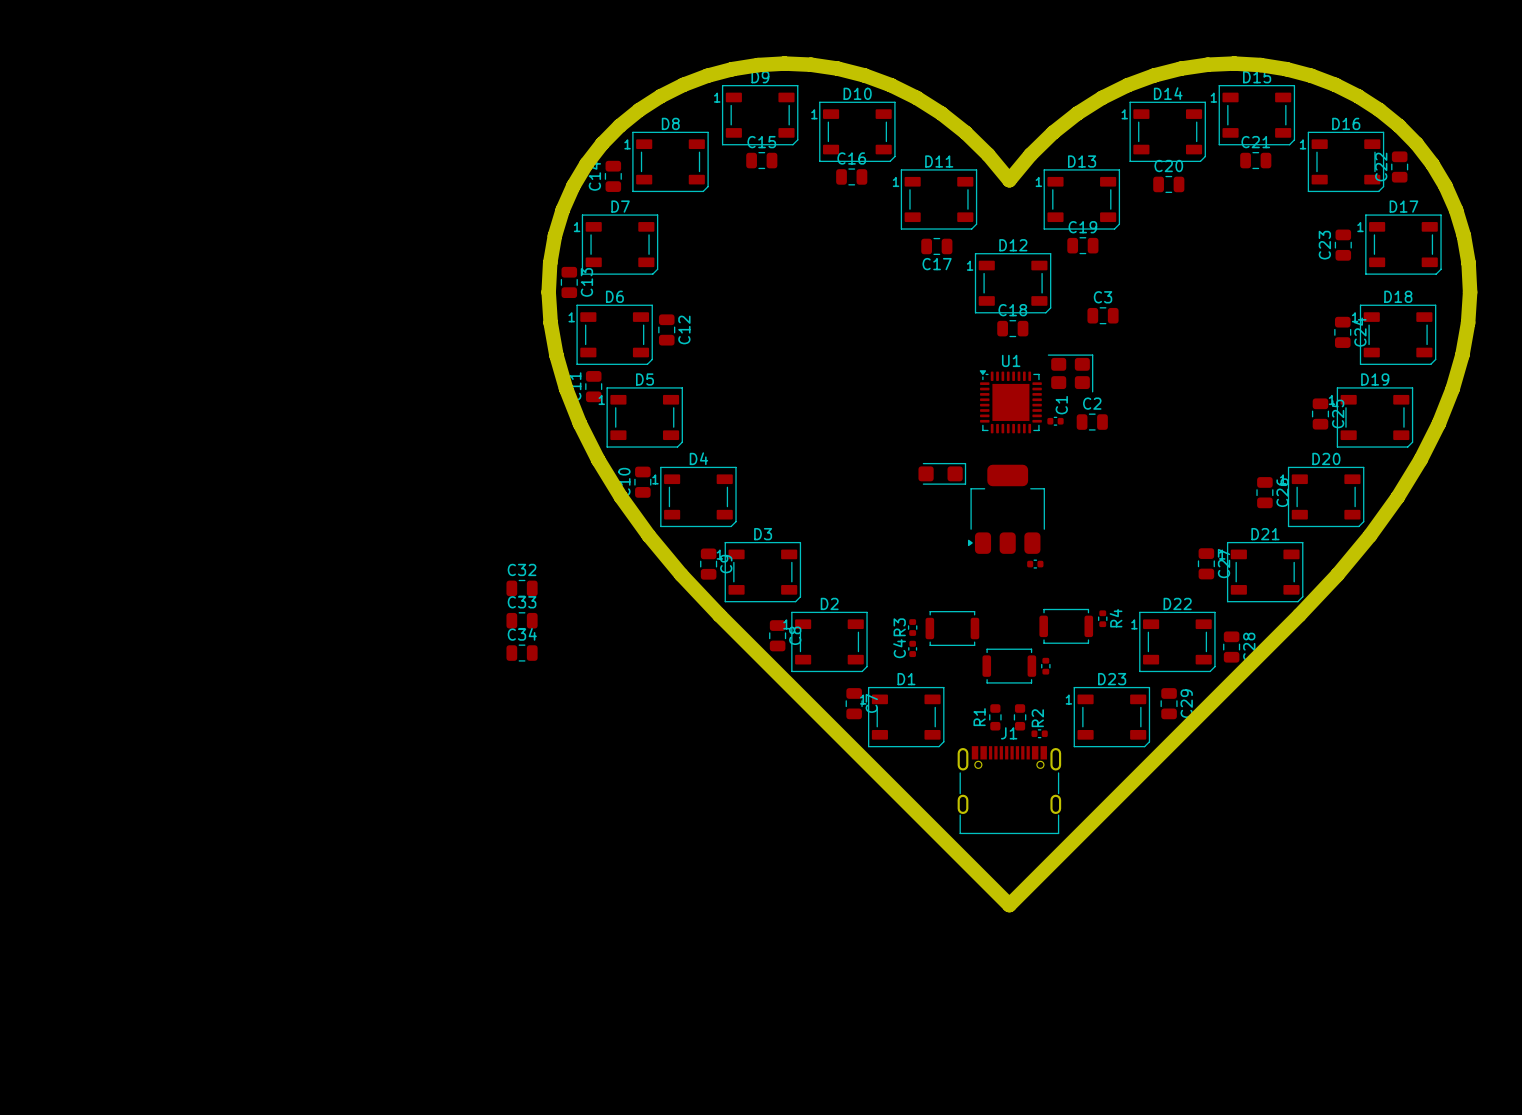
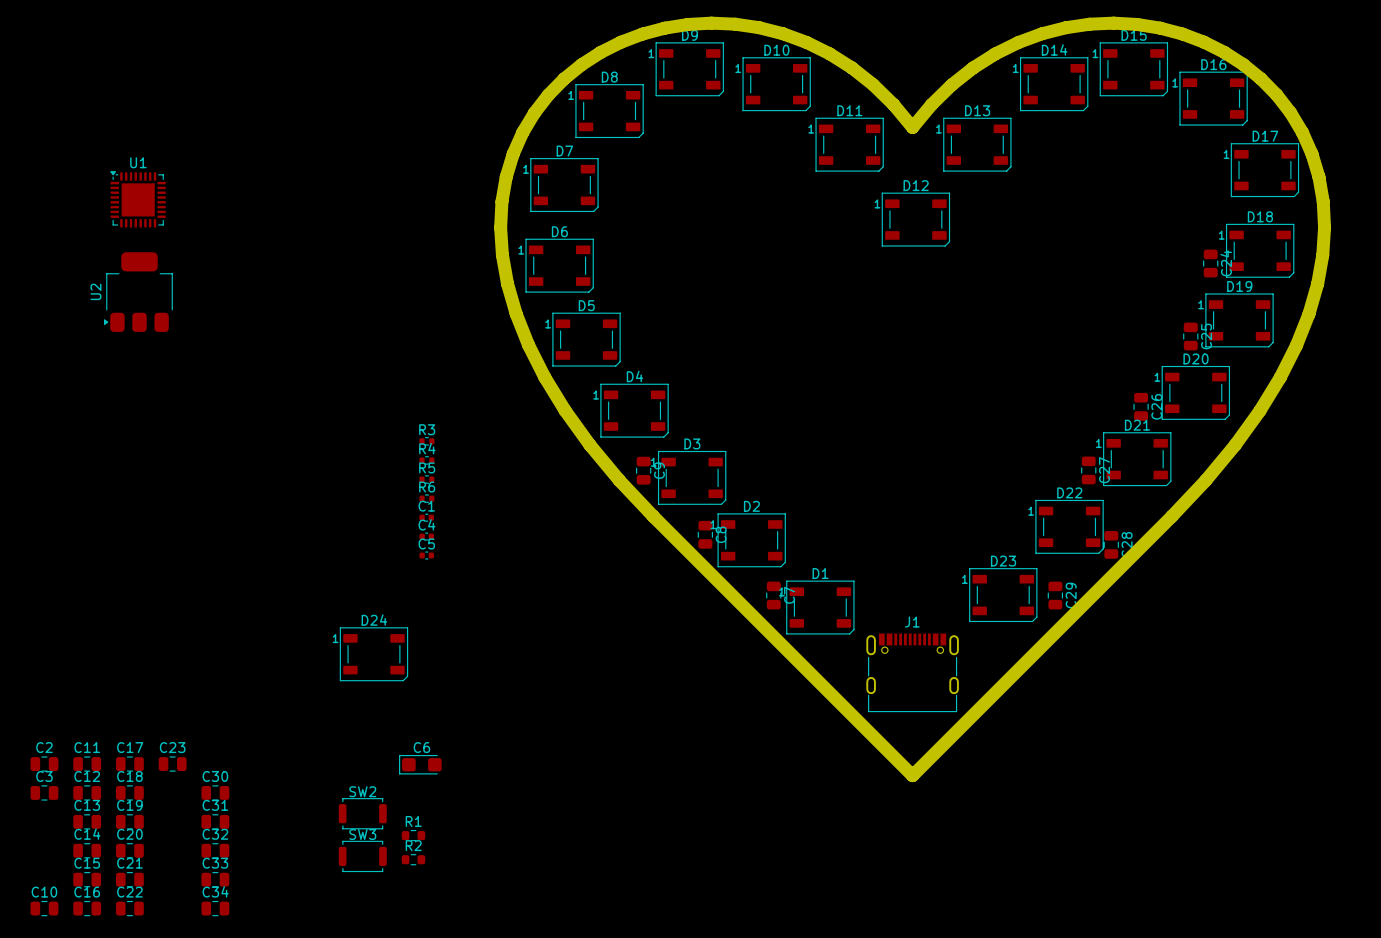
C15 position: (761, 160) -> (87, 879)
C21 position: (1255, 160) -> (129, 879)
D16 position: (1345, 161) -> (1213, 98)
C22 rotation: 0° (1399, 166) -> 90° clockwise (129, 908)
C22 position: (1399, 166) -> (129, 908)
C14 rotation: 0° (613, 176) -> 90° clockwise (87, 850)
C14 position: (613, 176) -> (87, 850)
C16 position: (851, 176) -> (87, 908)
C20 position: (1168, 184) -> (129, 850)
D17 position: (1403, 244) -> (1264, 170)
C19 position: (1082, 245) -> (129, 821)
C23 rotation: 0° (1343, 245) -> 90° clockwise (172, 764)
C23 position: (1343, 245) -> (172, 764)
C17 position: (936, 246) -> (129, 764)
C17 name position: C17 (937, 264) -> C17 (130, 747)
C13 rotation: 0° (569, 282) -> 90° clockwise (87, 821)
C13 position: (569, 282) -> (87, 821)
C13 name position: C13 (586, 282) -> C13 (87, 805)
C3 position: (1103, 315) -> (44, 792)
C18 position: (1012, 328) -> (129, 792)
C12 rotation: 0° (666, 329) -> 90° clockwise (87, 792)
C12 position: (666, 329) -> (87, 792)
C12 name position: C12 (684, 329) -> C12 (87, 776)
D18 position: (1398, 334) -> (1260, 250)
U2: none -> (138, 292)
part: (1070, 373) -> none
C11 rotation: 0° (593, 386) -> 90° clockwise (87, 764)
C11 position: (593, 386) -> (87, 764)
U1 position: (1010, 401) -> (138, 199)
C1 name rotation: 0° (1061, 405) -> 90° clockwise (426, 506)
D19 position: (1374, 417) -> (1239, 320)
C1 position: (1055, 421) -> (426, 517)
C2 position: (1092, 422) -> (44, 764)
part: (942, 473) -> none
C10 rotation: 0° (642, 482) -> 90° clockwise (44, 908)
C10 position: (642, 482) -> (44, 908)
D20 position: (1326, 496) -> (1195, 392)
part: (1006, 509) -> none
part: (1035, 564) -> none
D21 position: (1265, 572) -> (1137, 459)
R5: none -> (426, 479)
C32 position: (522, 588) -> (215, 850)
R6: none -> (426, 498)
R4 rotation: 0° (1102, 618) -> 90° clockwise (426, 460)
R4 position: (1102, 618) -> (426, 460)
C33 position: (522, 620) -> (215, 879)
part: (1066, 626) -> none
R3 rotation: 0° (912, 627) -> 90° clockwise (426, 441)
R3 position: (912, 627) -> (426, 441)
part: (952, 628) -> none
D22 position: (1177, 641) -> (1069, 526)
C4 rotation: 0° (912, 648) -> 90° clockwise (426, 536)
C4 position: (912, 648) -> (426, 536)
C34 position: (522, 653) -> (215, 908)
C5: none -> (426, 555)
part: (1009, 666) -> none
part: (1045, 666) -> none
R1 rotation: 0° (995, 717) -> 90° clockwise (413, 835)
R1 position: (995, 717) -> (413, 835)
R2 rotation: 0° (1020, 717) -> 90° clockwise (413, 859)
R2 position: (1020, 717) -> (413, 859)
D23 position: (1111, 717) -> (1003, 595)
R2 name position: R2 (1037, 718) -> R2 (413, 845)
part: (1039, 733) -> none
D24: none -> (373, 654)
C6: none -> (420, 764)
C30: none -> (215, 792)
SW2: none -> (362, 813)
C31: none -> (215, 821)
SW3: none -> (362, 856)

